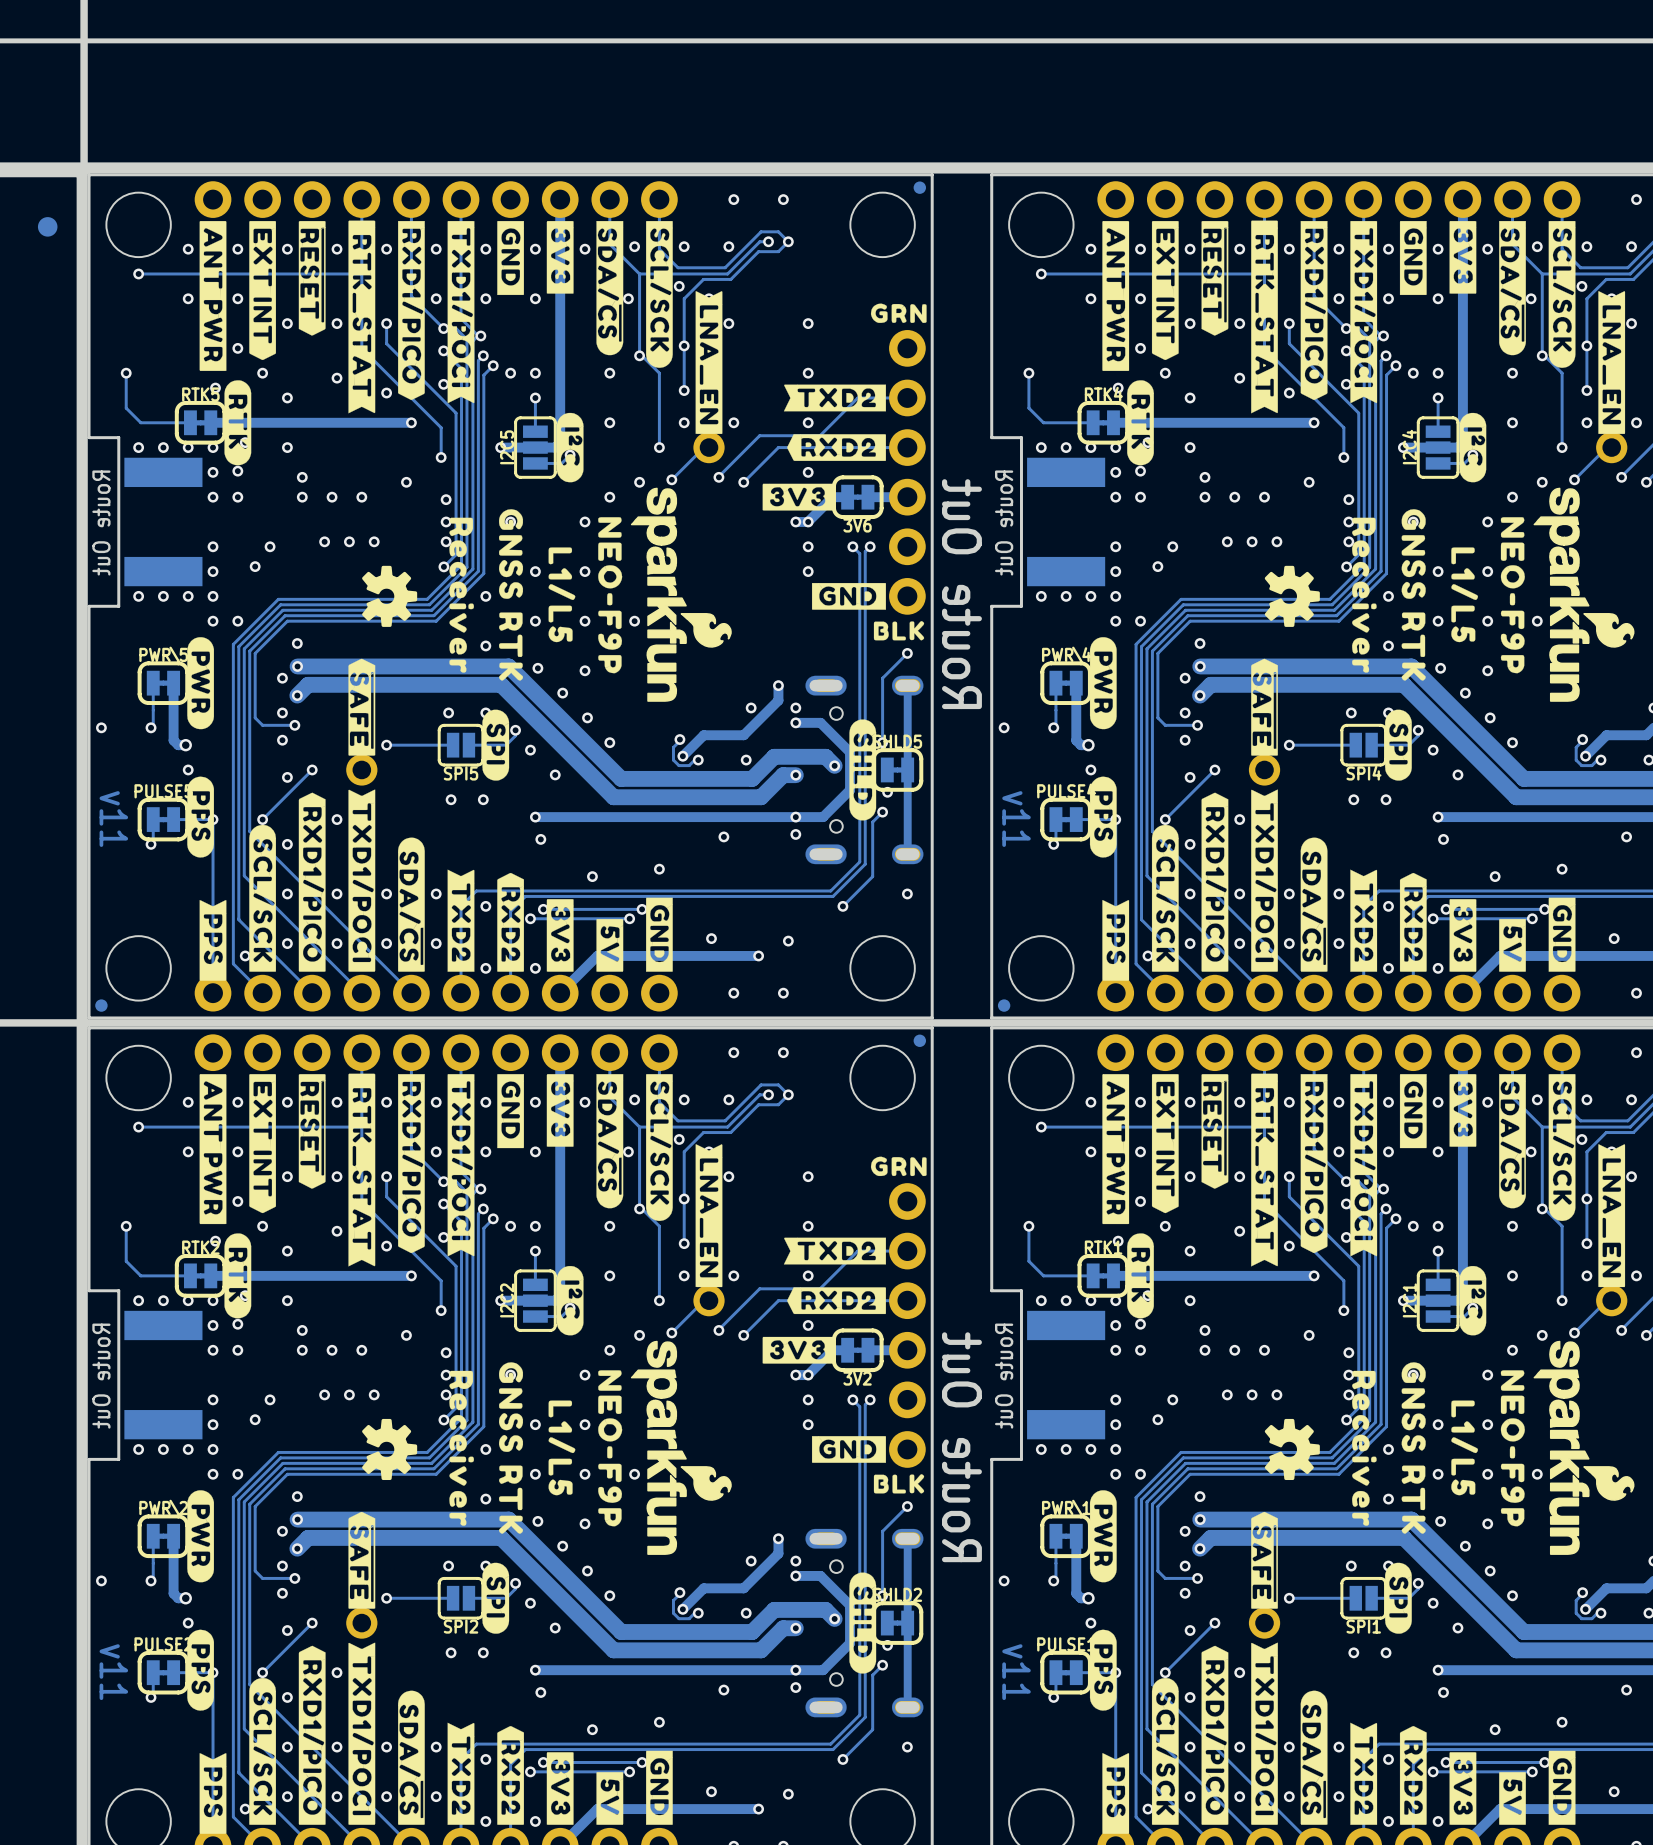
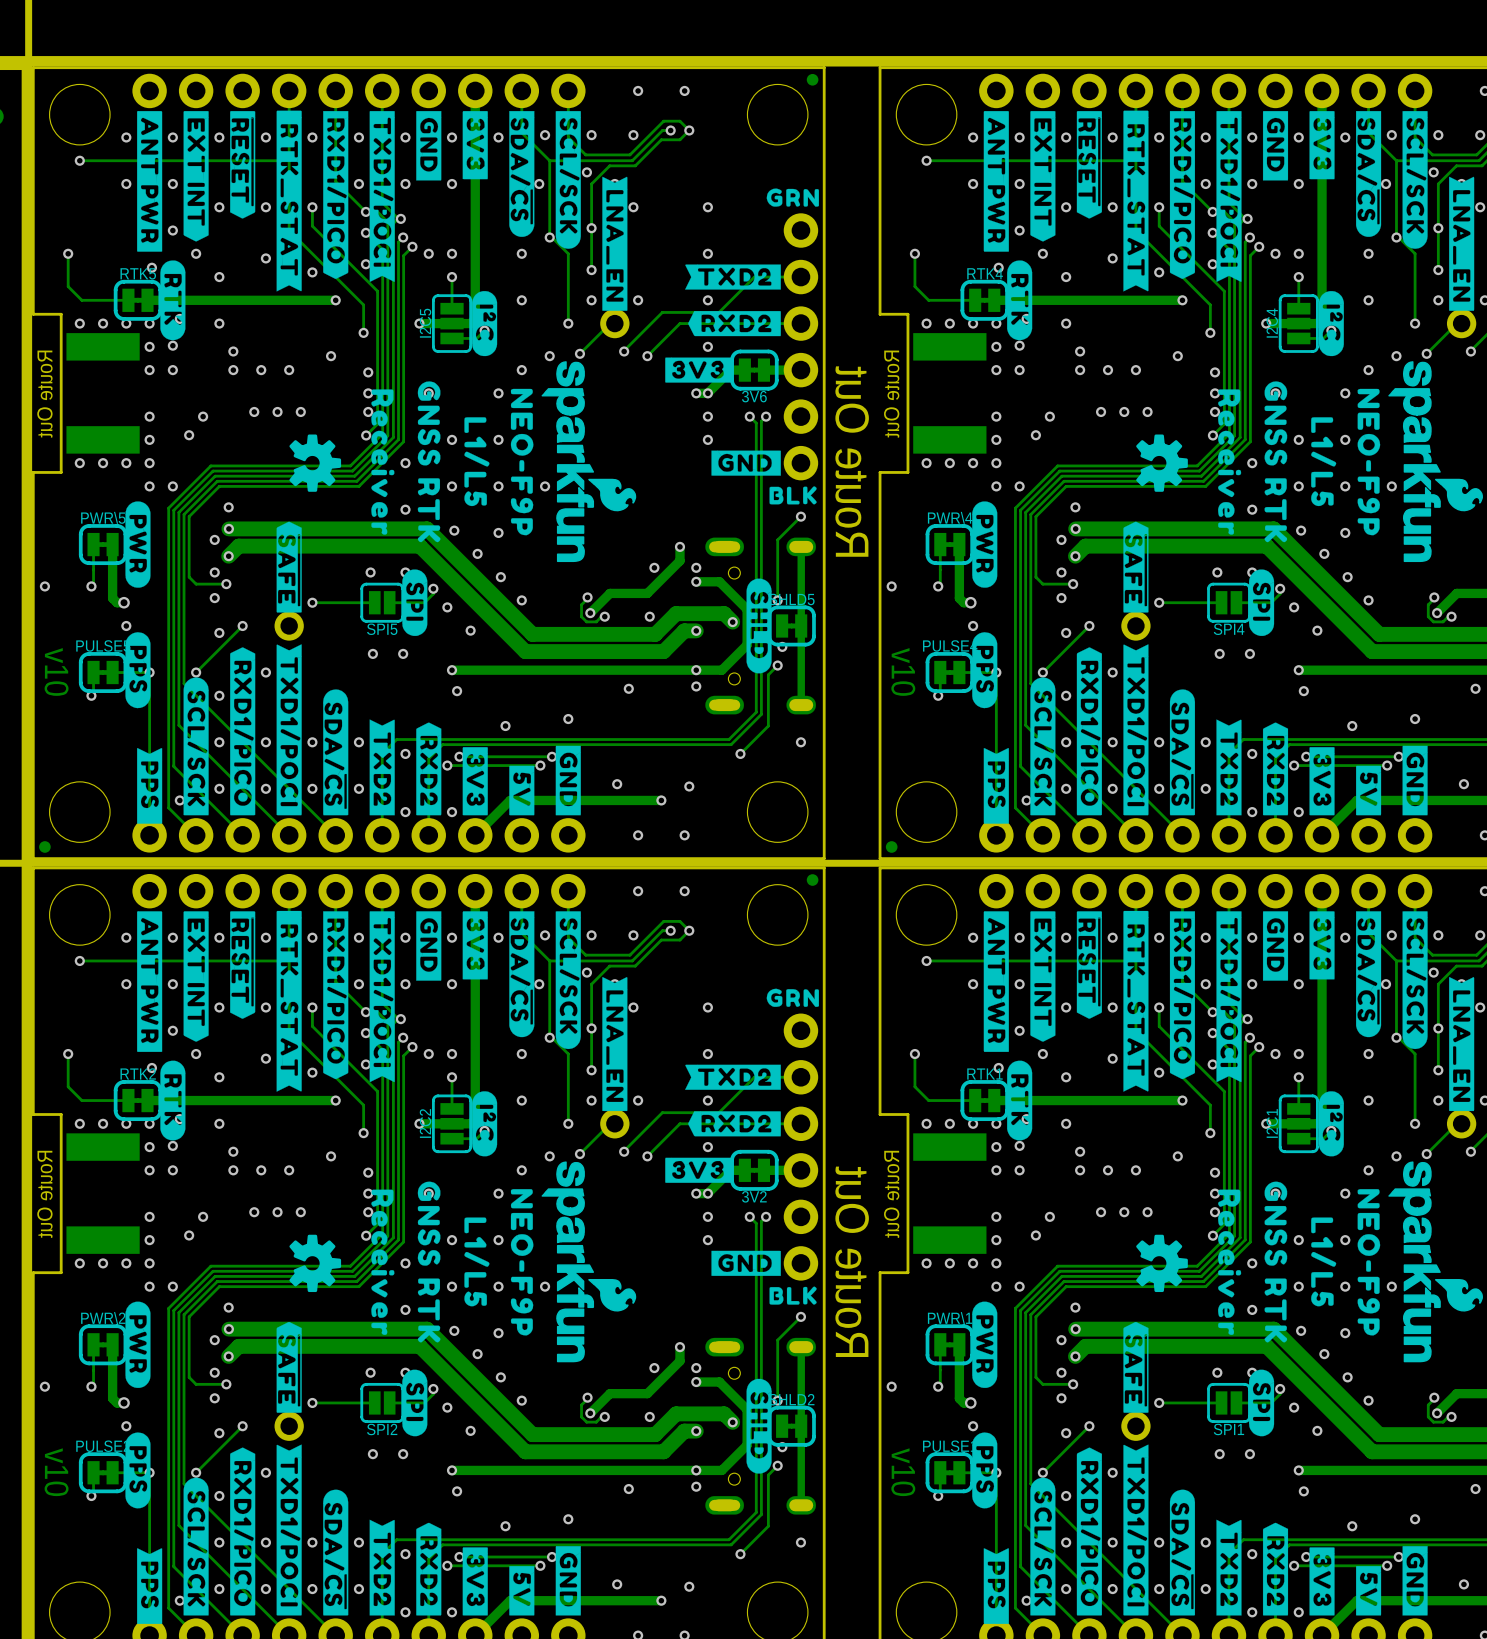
text: v11 (113, 819) -> v10 (56, 671)
text: v11 (1016, 819) -> v10 (903, 671)
text: v11 (113, 1672) -> v10 (56, 1472)
text: v11 (1016, 1672) -> v10 (903, 1472)

